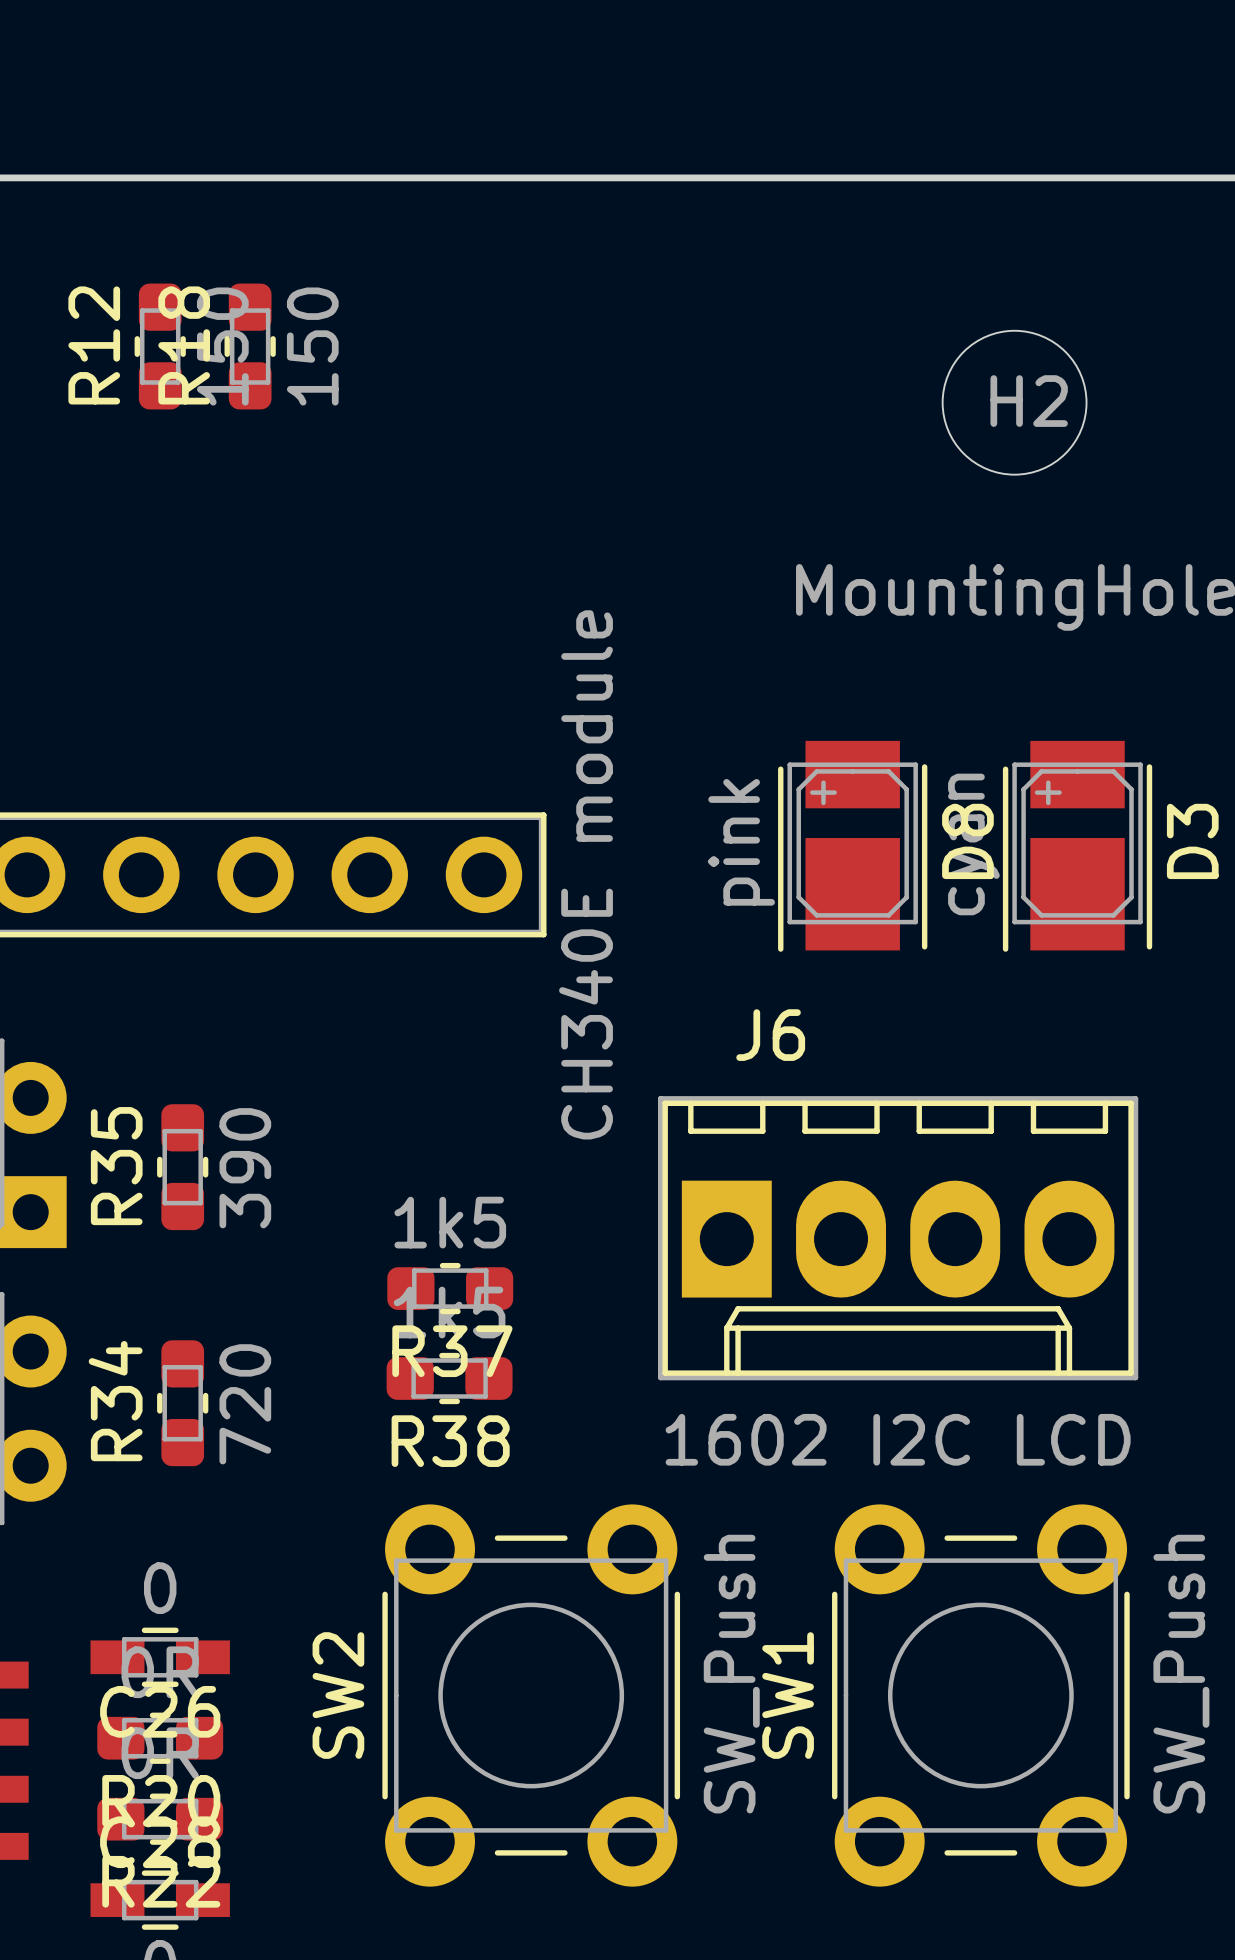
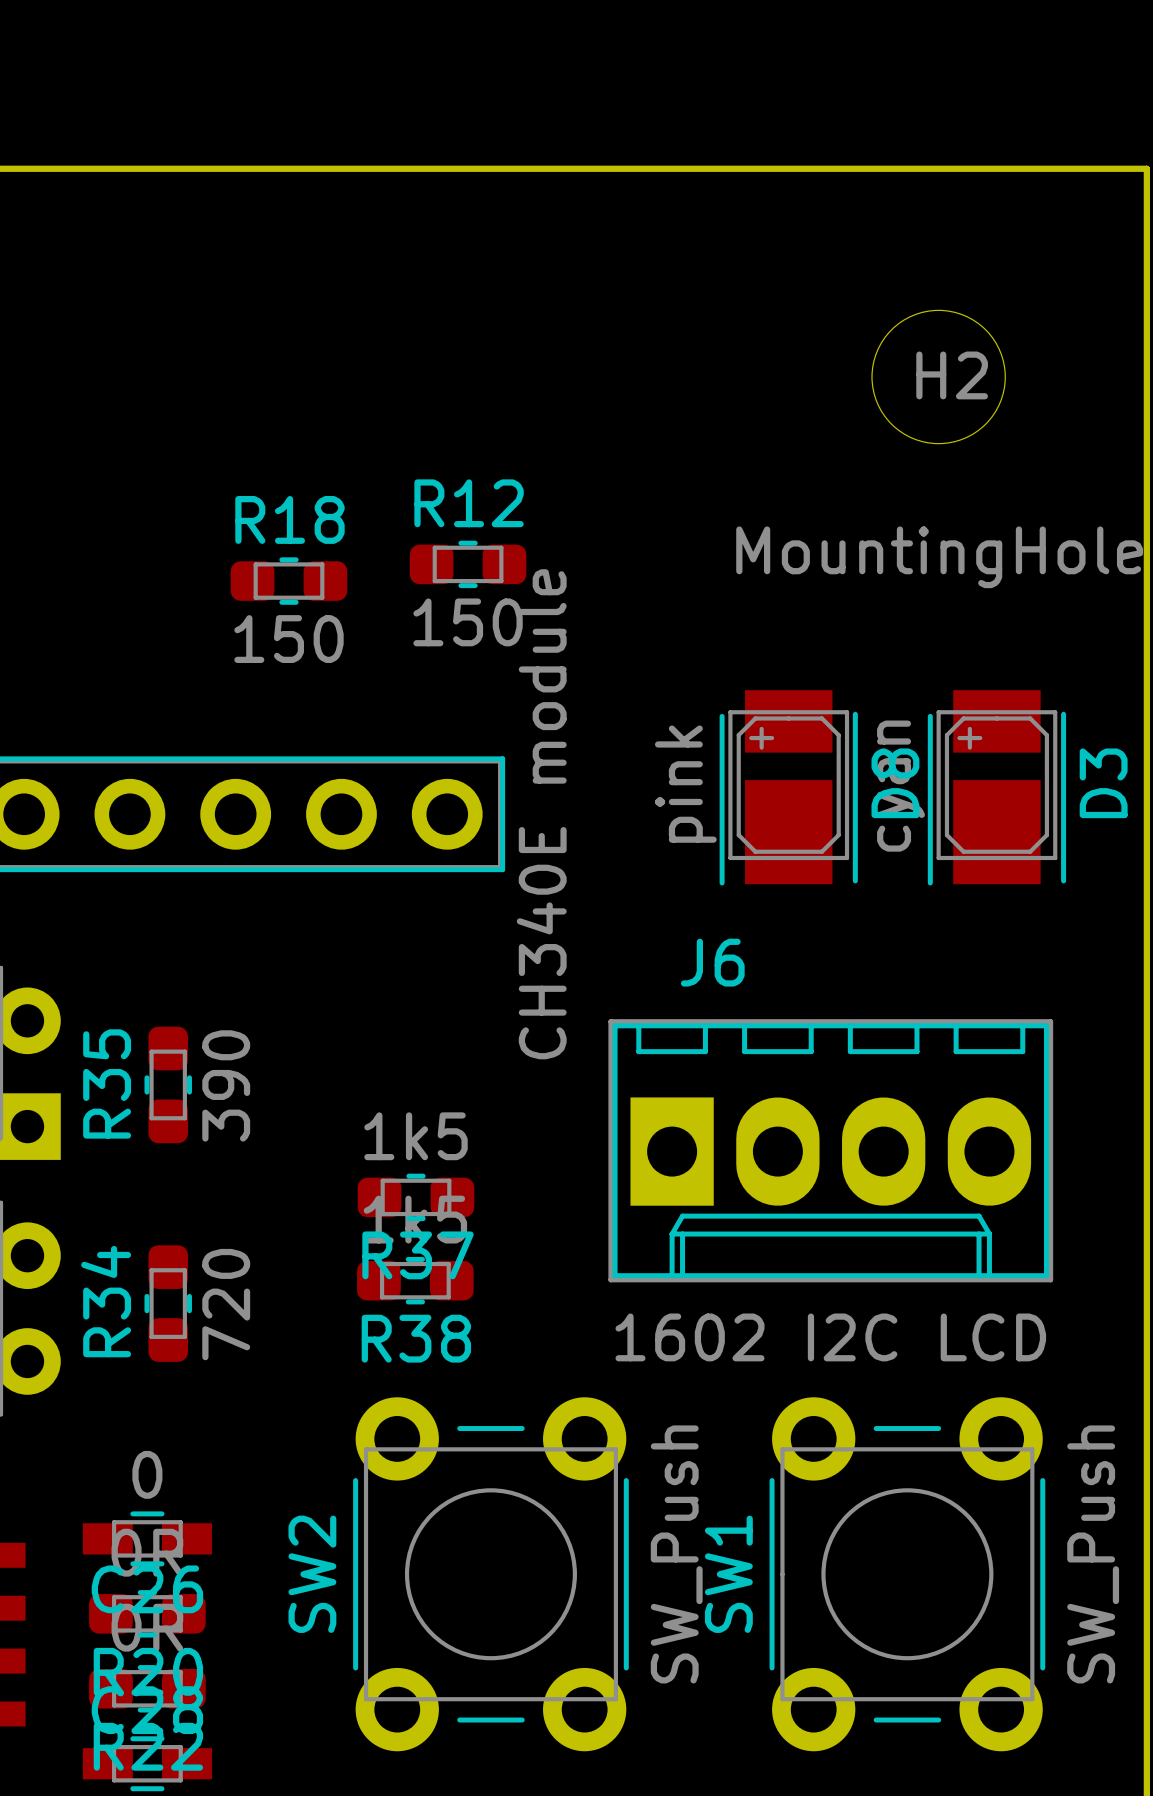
R12 rotation: 0° (160, 346) -> 90° clockwise (468, 564)
R12 position: (160, 346) -> (468, 564)
R18 rotation: 0° (250, 346) -> 90° clockwise (288, 581)
R18 position: (250, 346) -> (288, 581)

